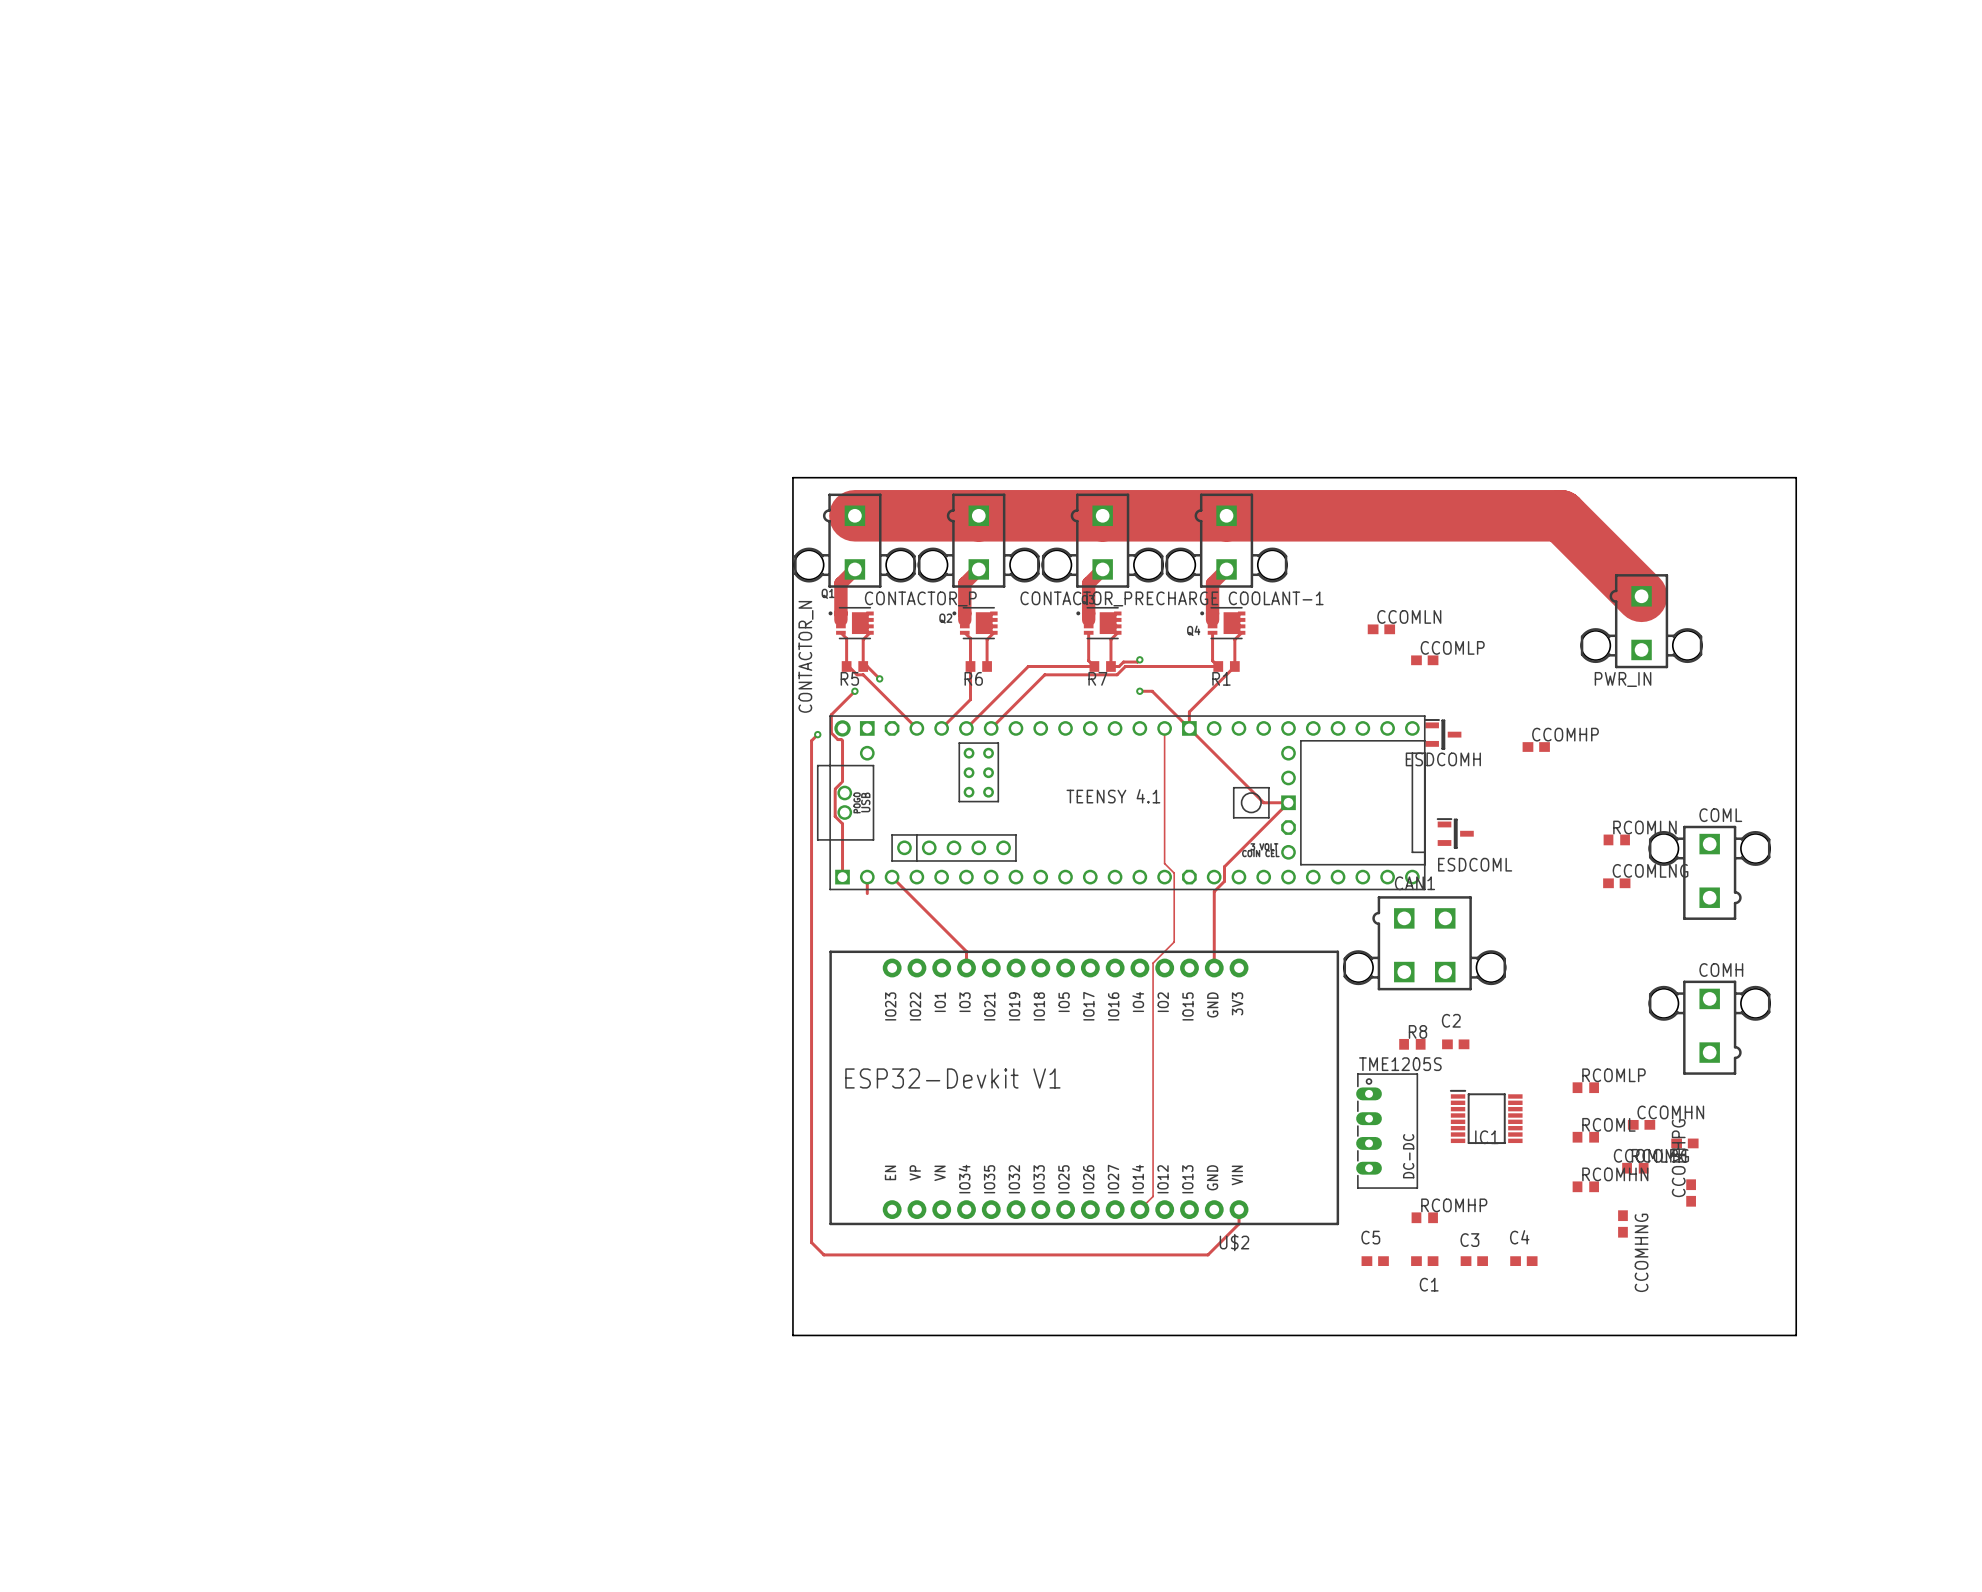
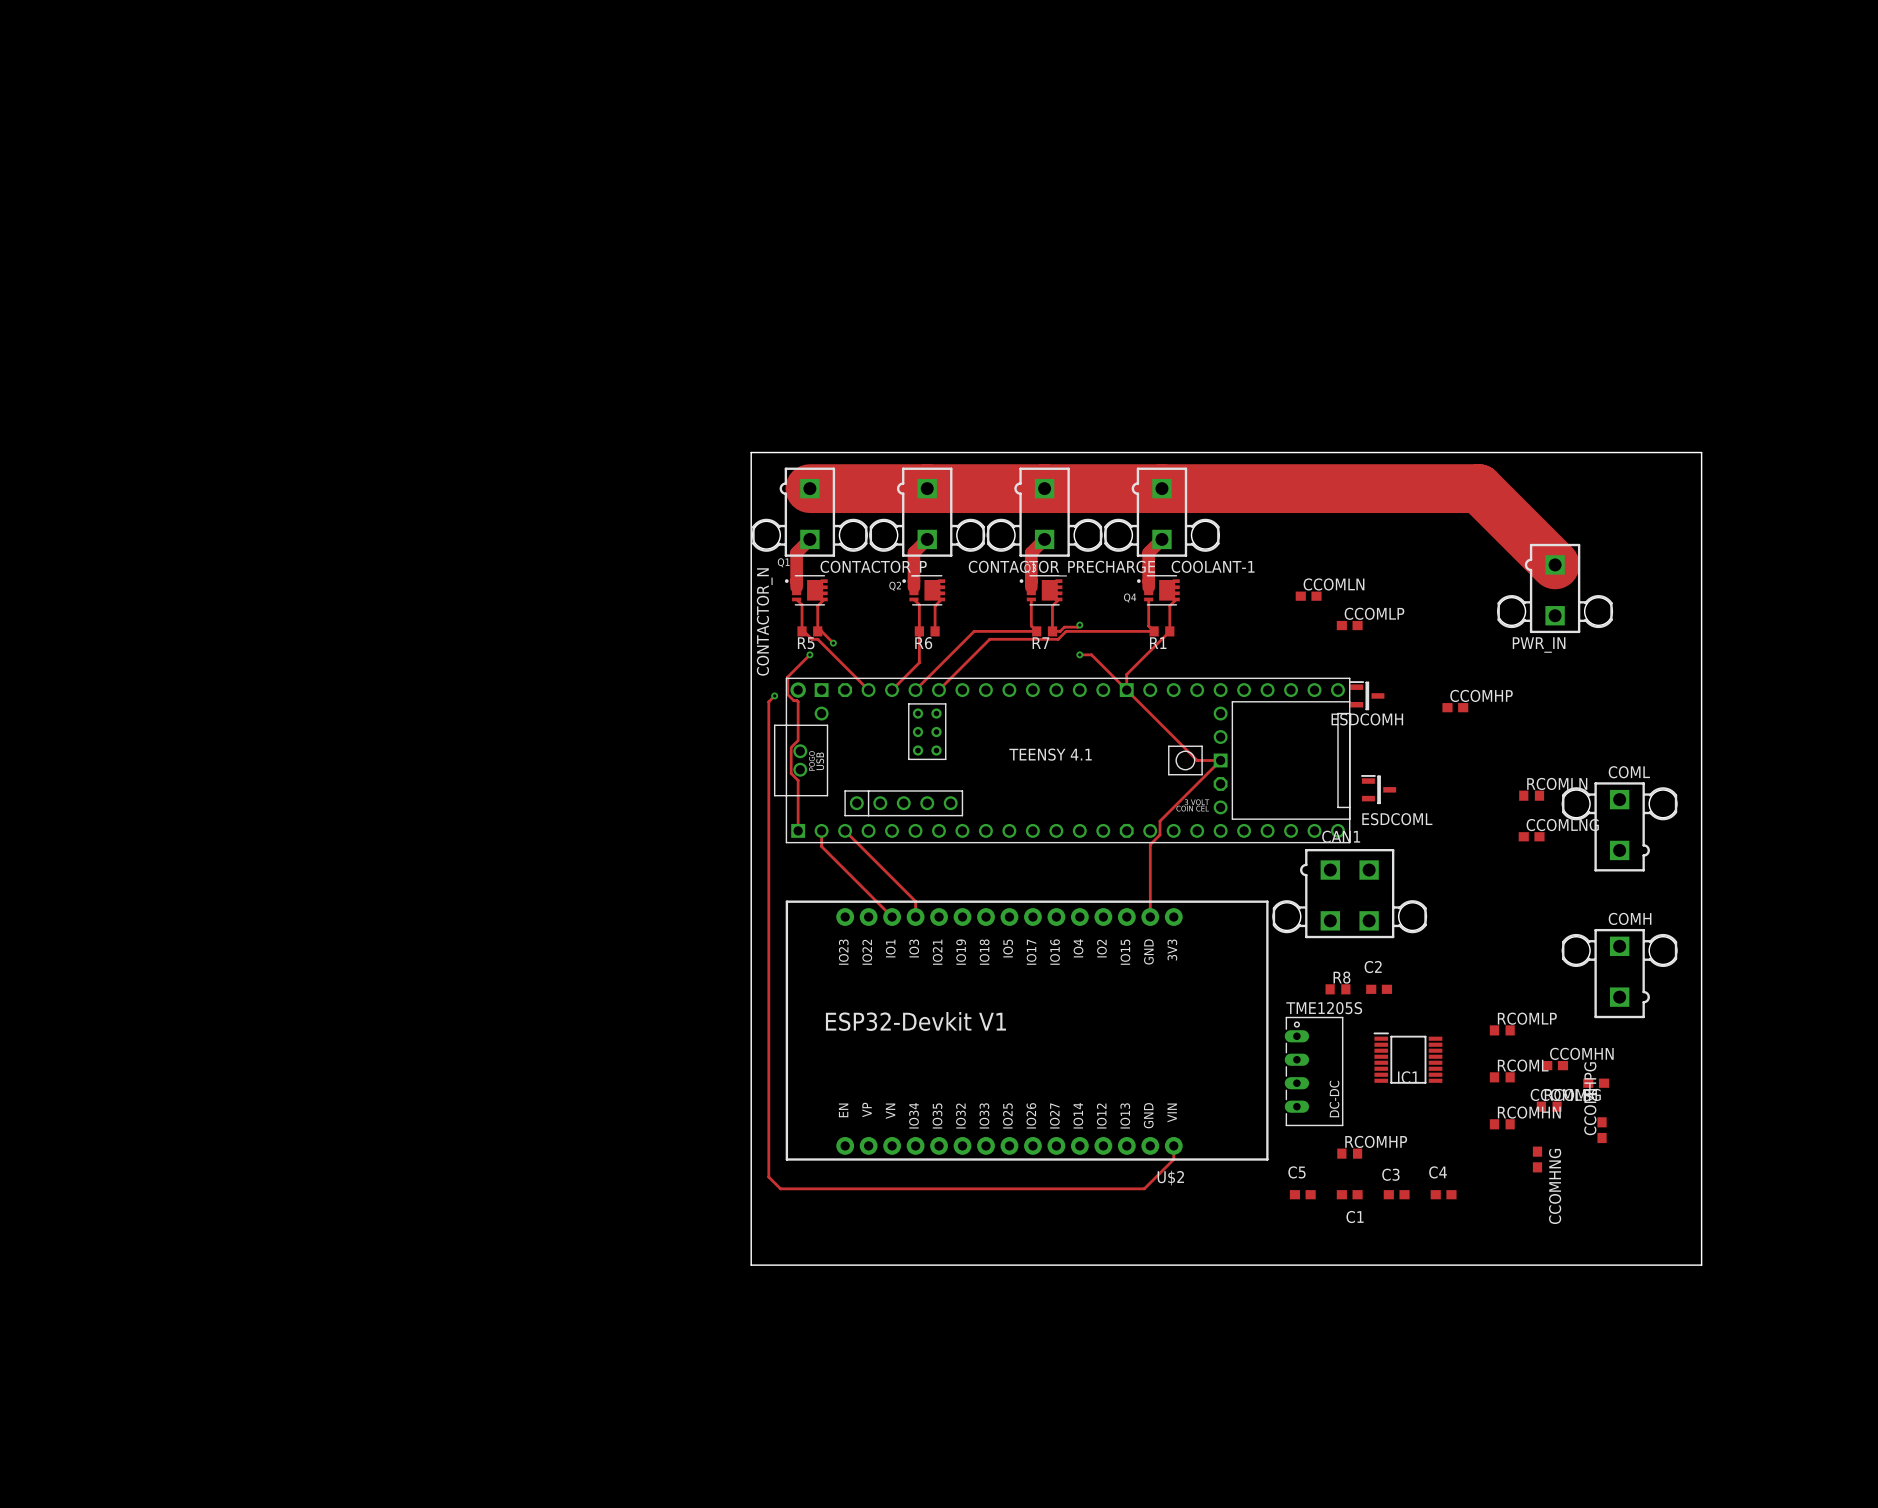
track: (1164, 728) (1164, 863) (1174, 873) (1174, 942) (1153, 963) (1153, 1196) (1139, 1209) -> none
track: none -> (821, 846) (892, 917)

